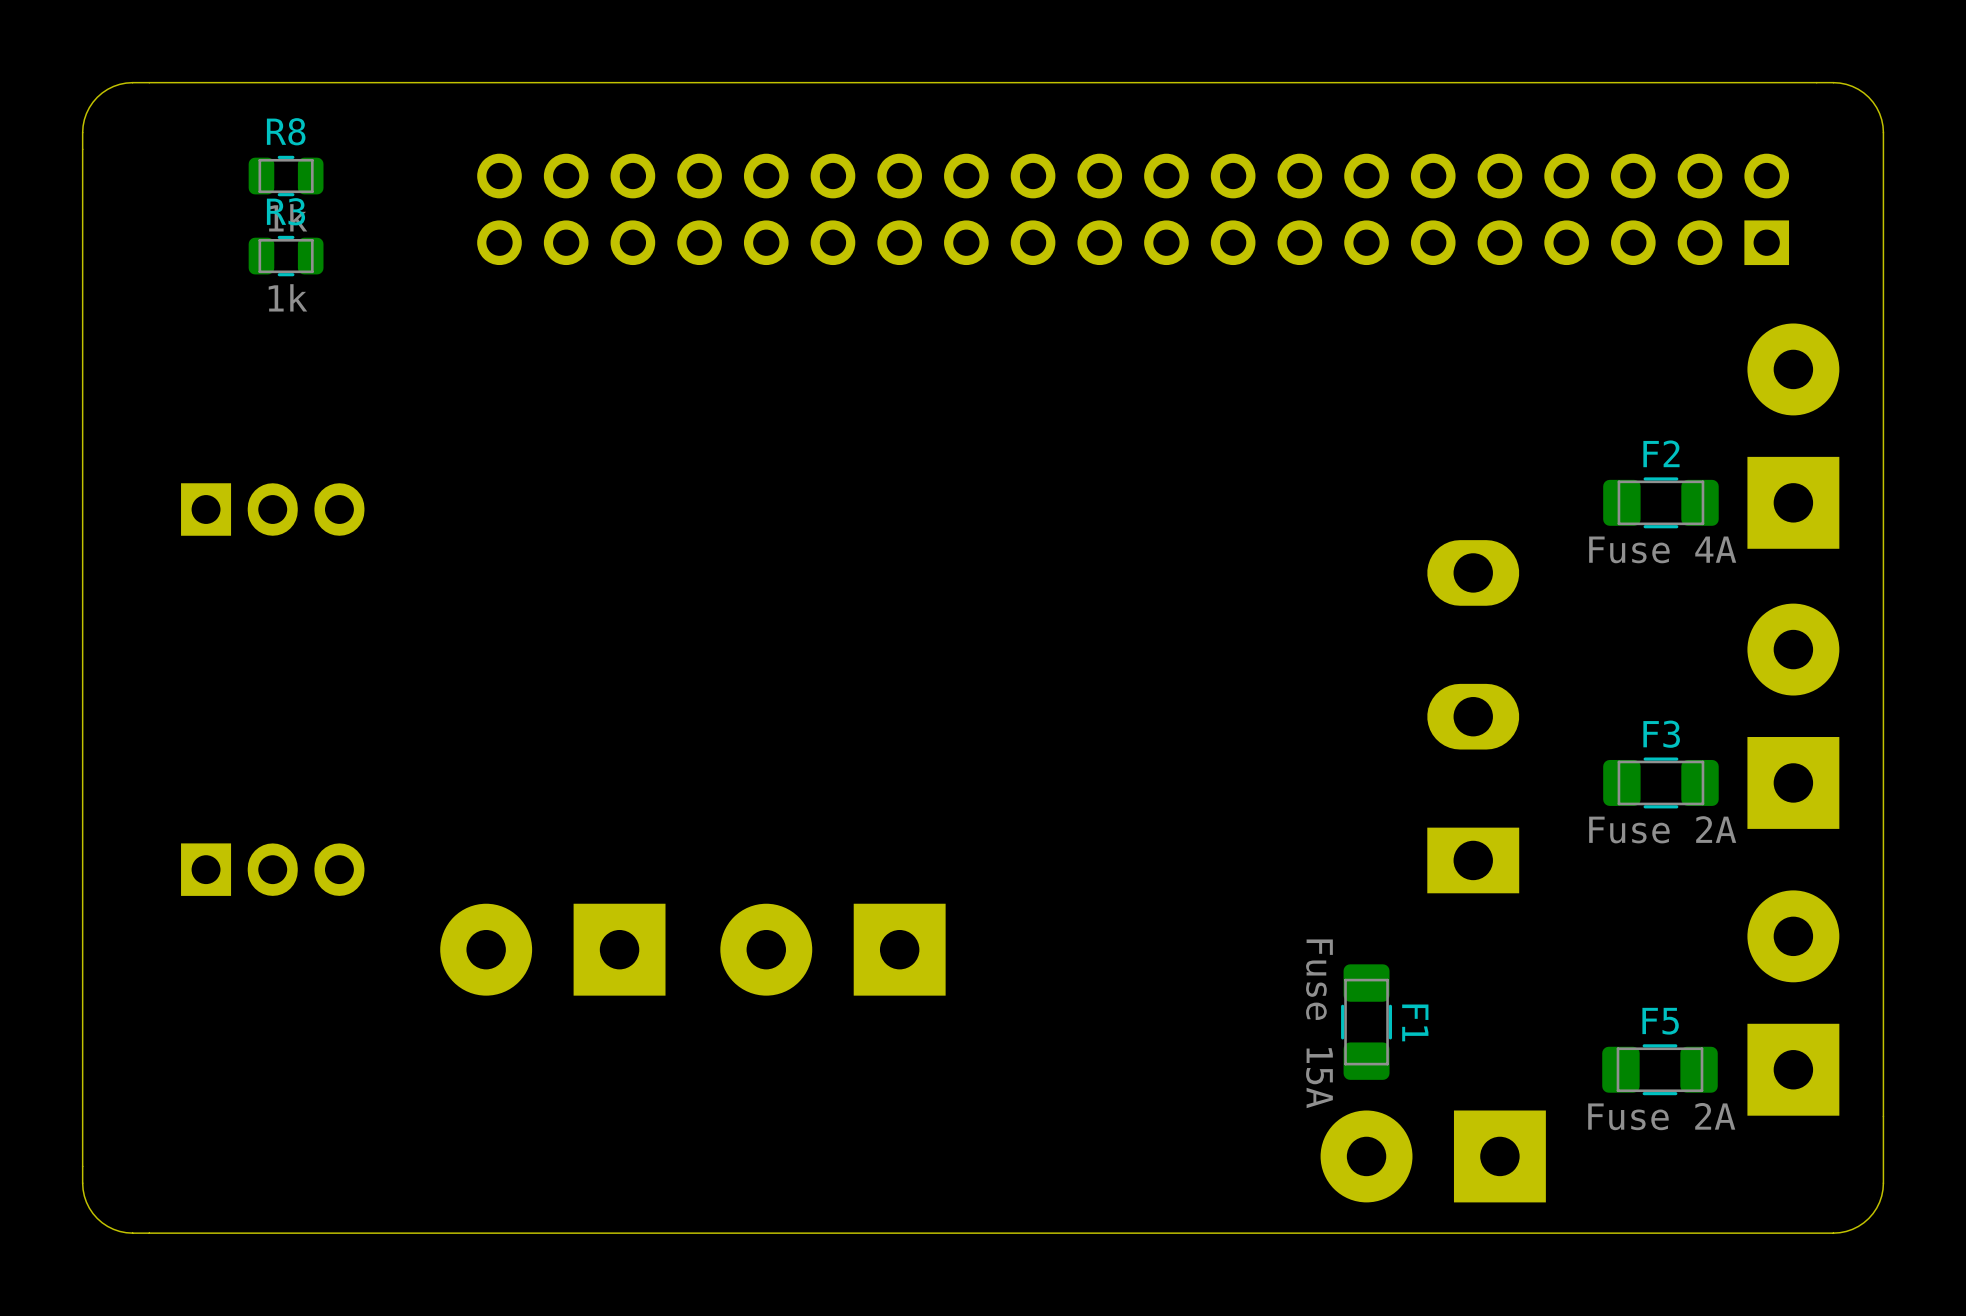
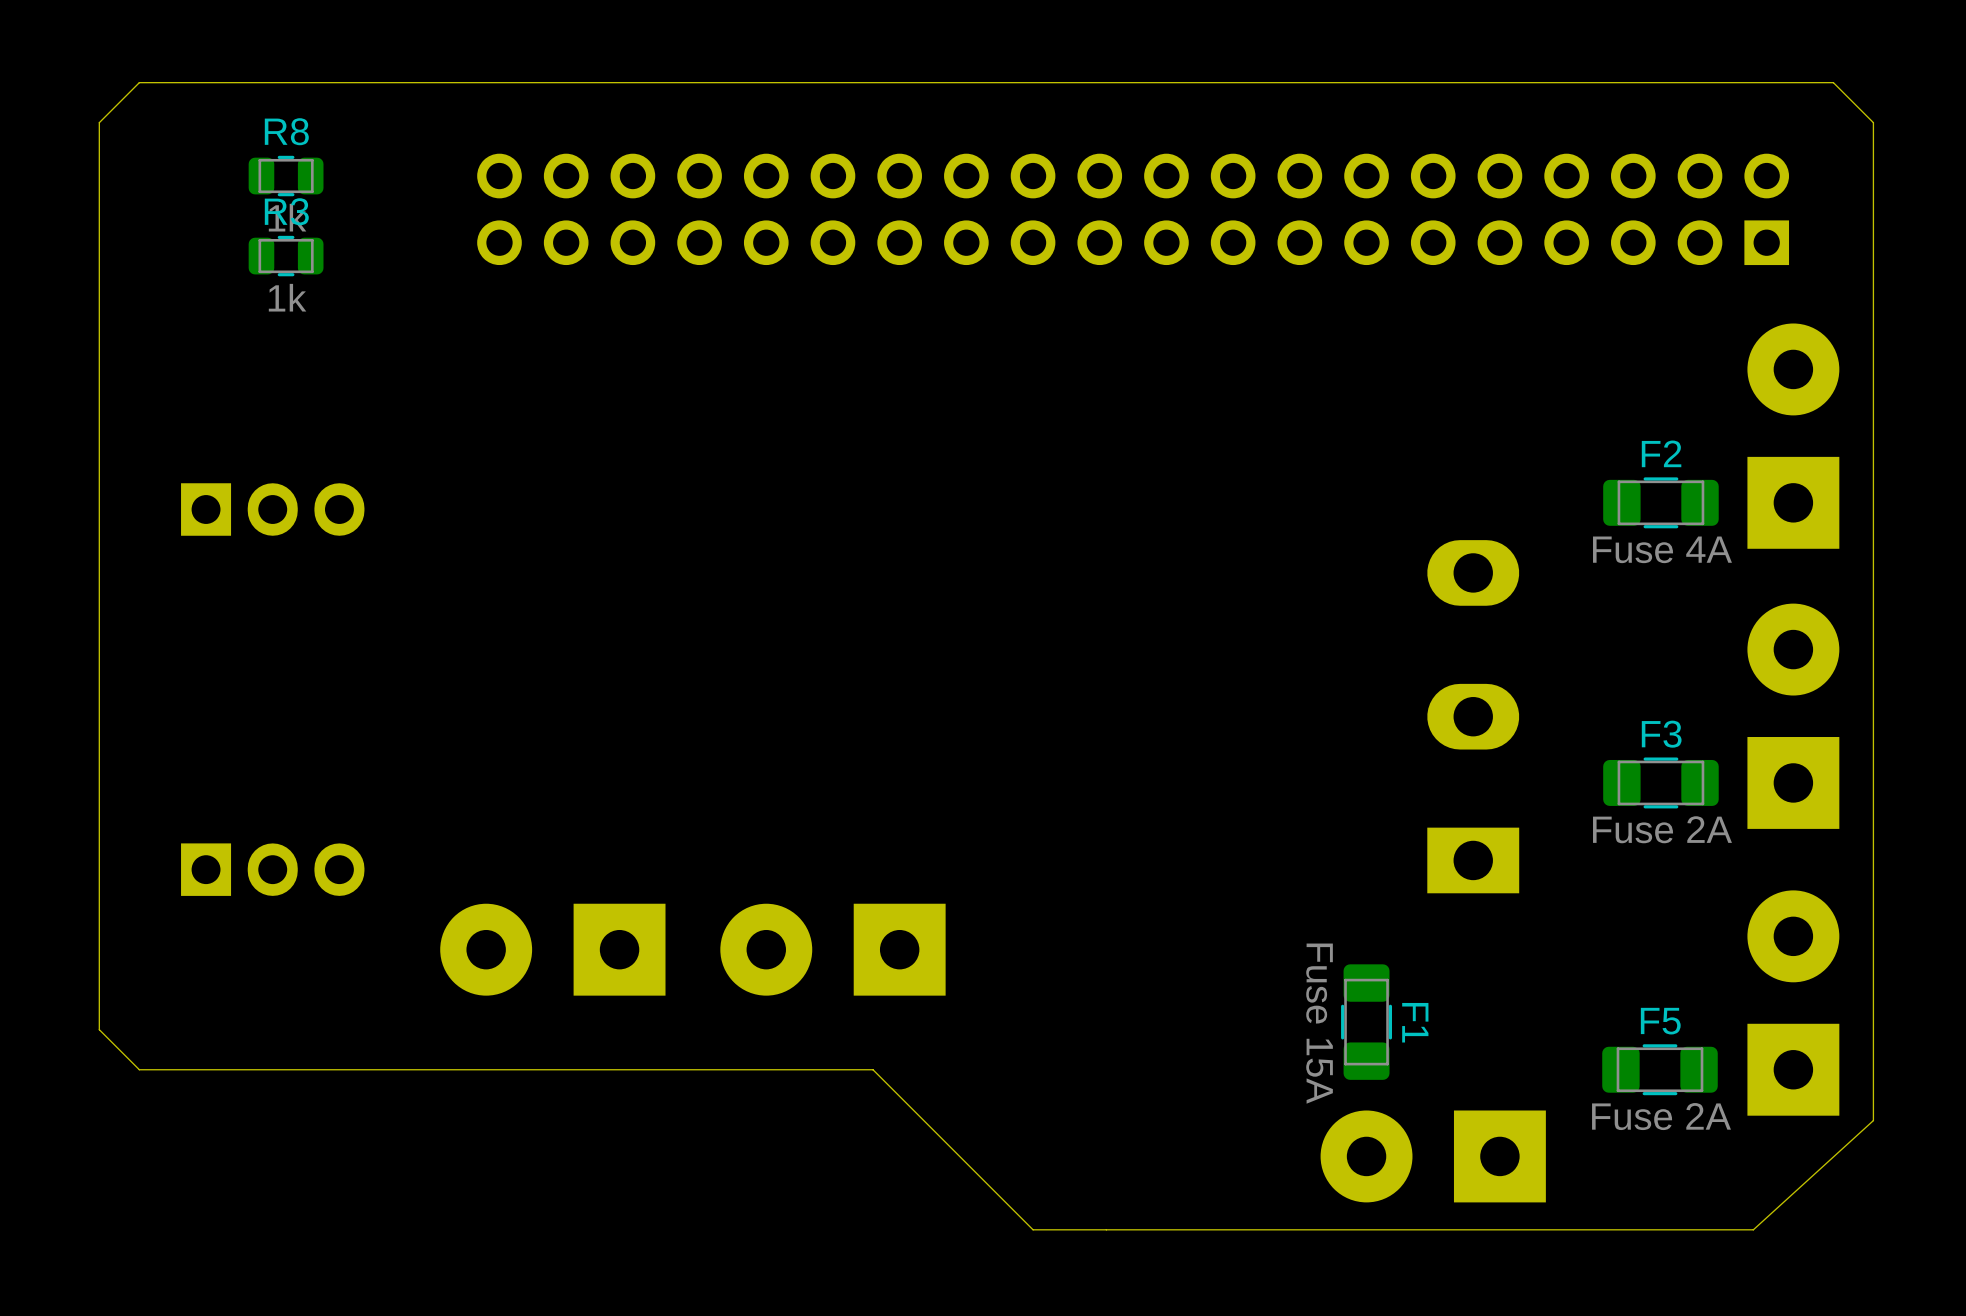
board edge: (1833, 82) (1852, 86) (1868, 97) (1879, 113) (1883, 132) (1883, 1183) (1881, 1196) (1876, 1208) (1863, 1222) (1846, 1231) (1833, 1233) (132, 1233) (113, 1229) (97, 1218) (86, 1202) (82, 1183) (82, 132) (86, 113) (97, 97) (113, 86) (126, 83) (139, 82) -> (1833, 82) (1873, 122) (1873, 1120) (1753, 1229) (1033, 1229) (872, 1069) (139, 1069) (99, 1029) (99, 122) (139, 82)

